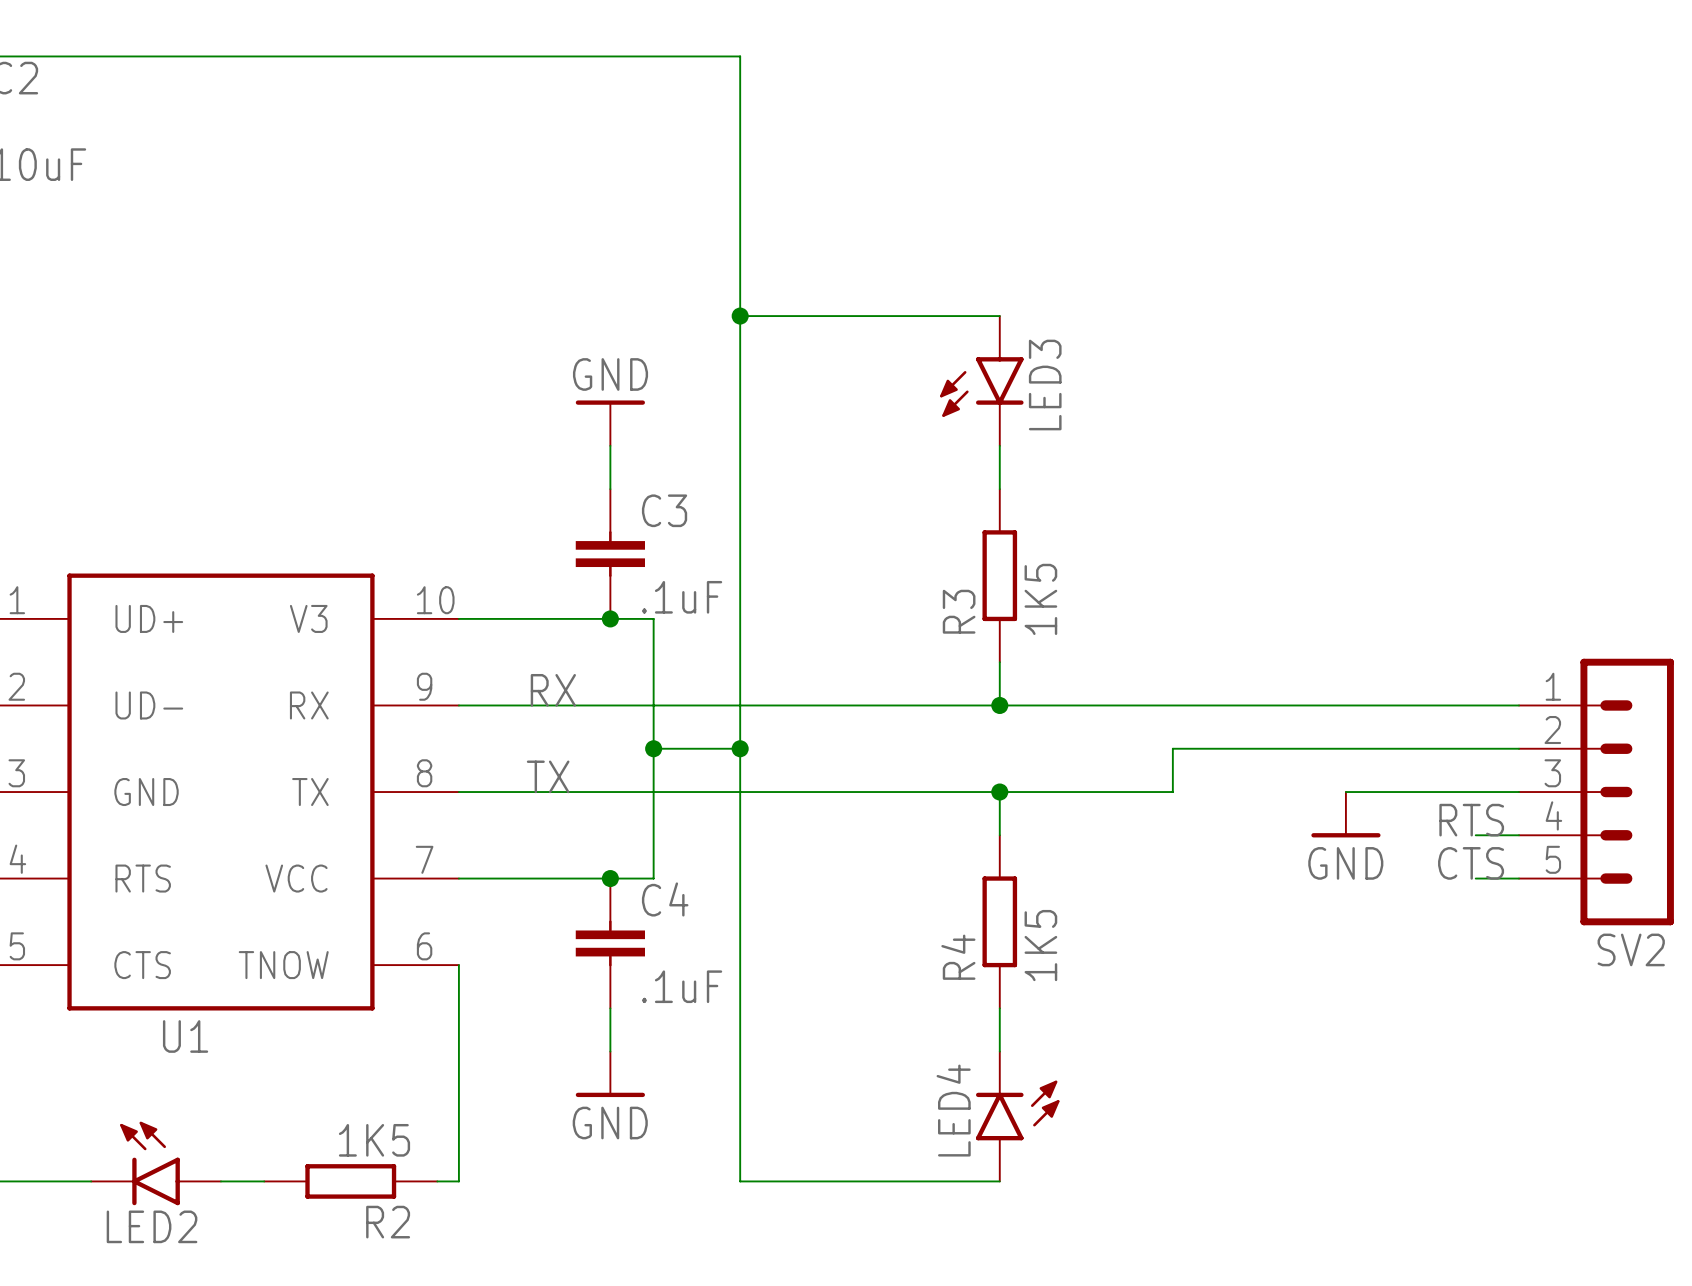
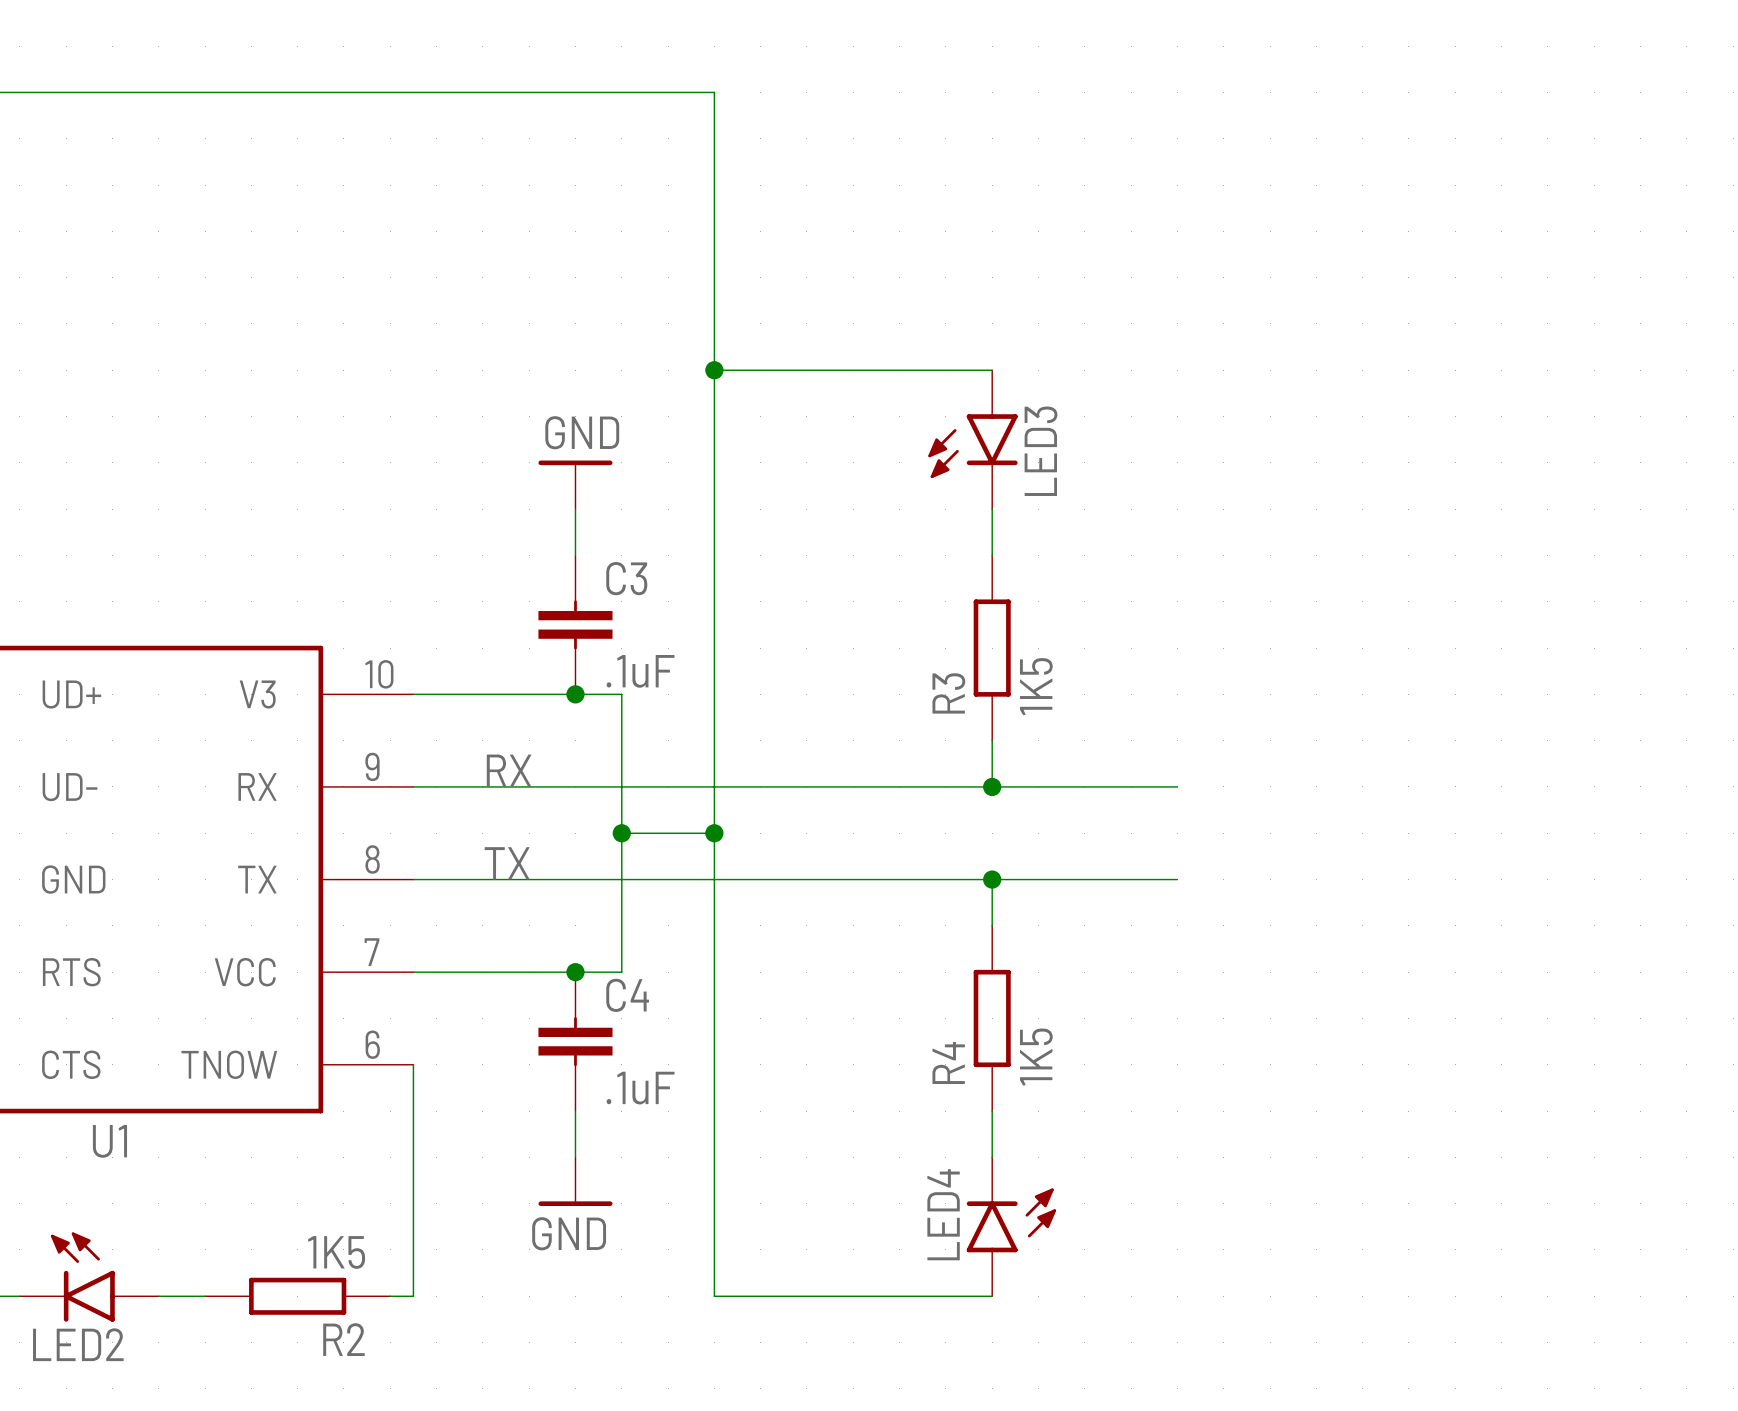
wire: (1172, 705) (1519, 705) -> none
wire: (1519, 748) (1172, 748) (1172, 792) -> none
wire: (1345, 792) (1519, 792) -> none
SV2: (1596, 792) -> none
power symbol: GND (1345, 814) -> none
label: RTS (1471, 820) -> none
wire: (1475, 835) (1519, 835) -> none
label: CTS (1471, 863) -> none
wire: (1475, 878) (1519, 878) -> none

